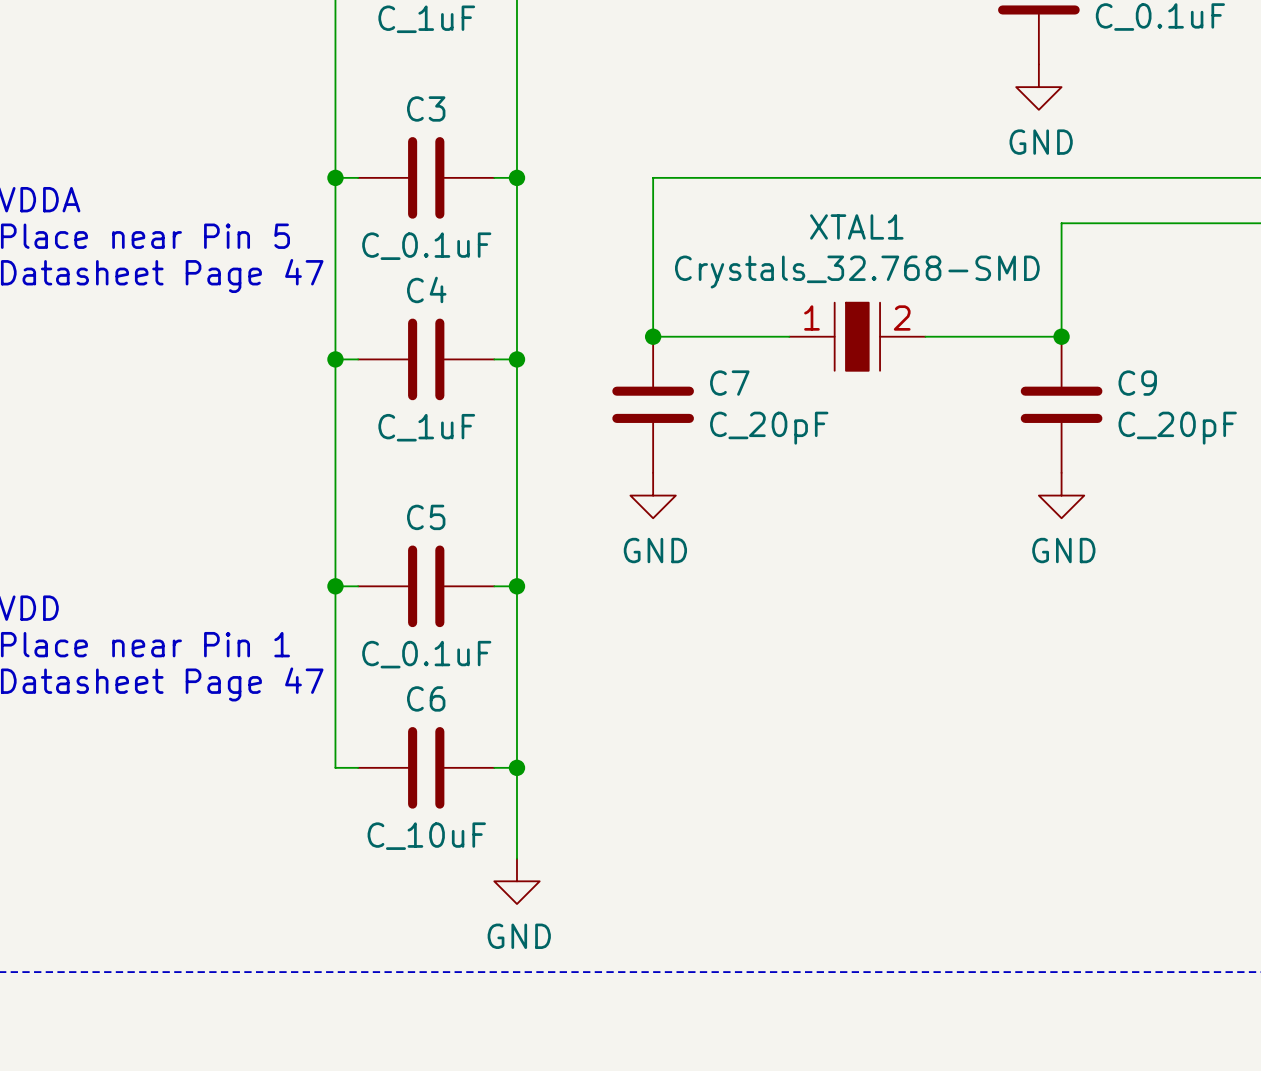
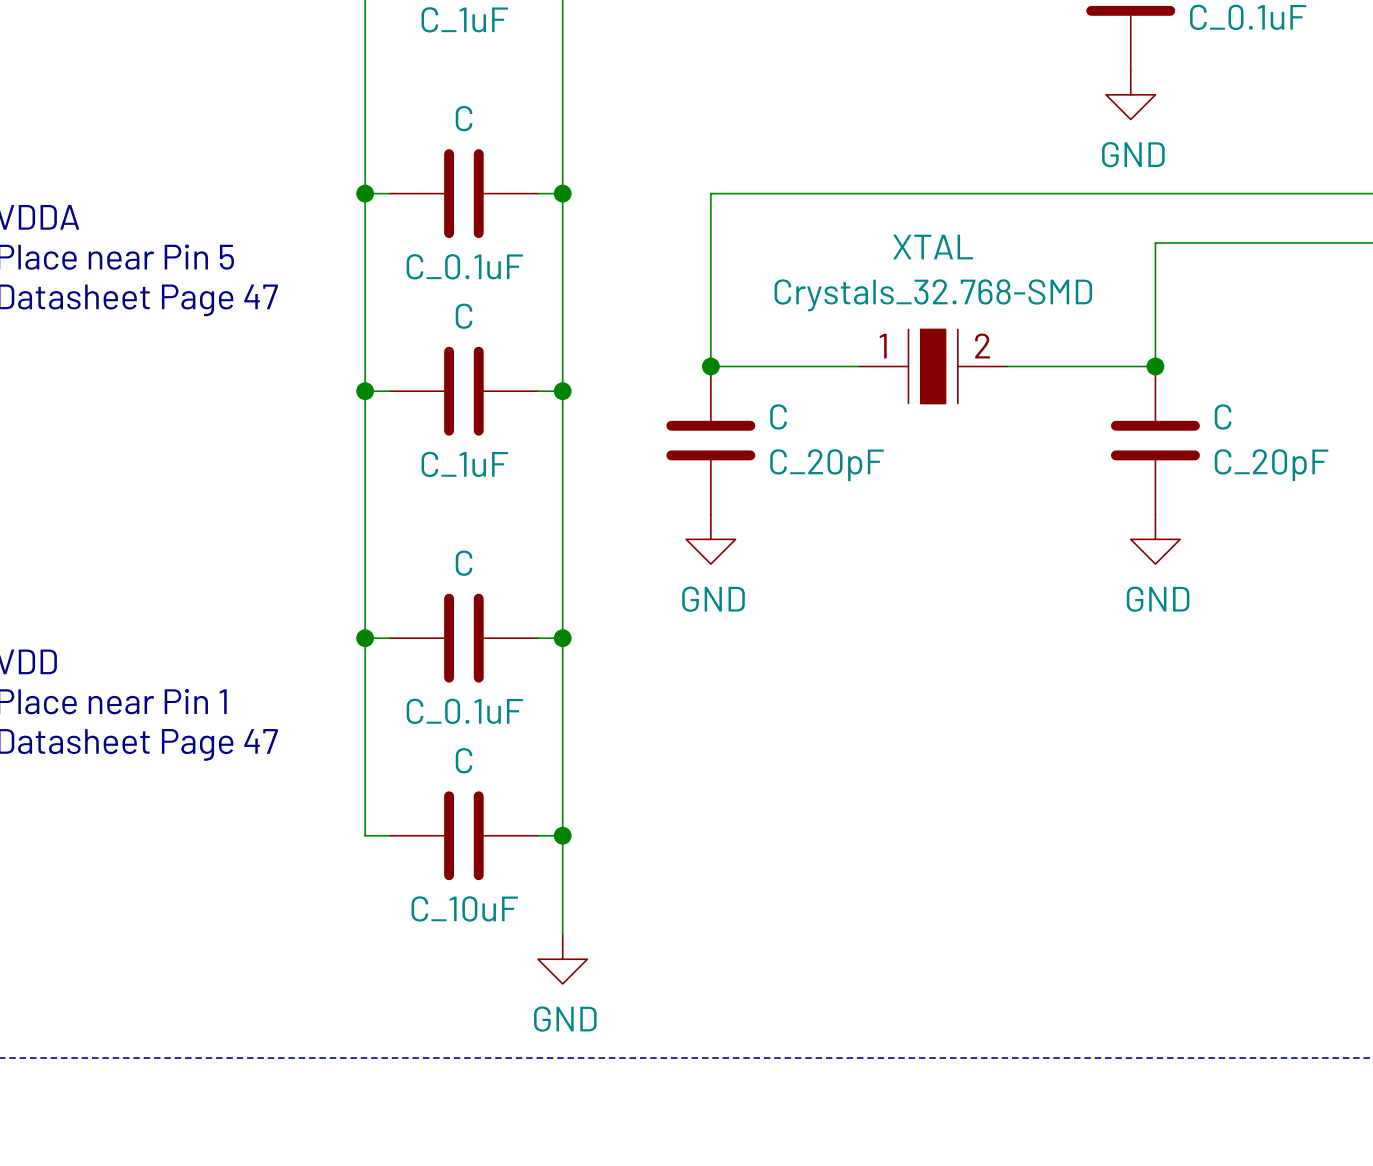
C3 name: C3 (426, 108) -> C (464, 118)
XTAL1 name: XTAL1 (856, 226) -> XTAL (933, 247)
C4 name: C4 (426, 289) -> C (464, 316)
C7 name: C7 (729, 383) -> C (778, 416)
C9 name: C9 (1137, 383) -> C (1223, 416)
C5 name: C5 (426, 517) -> C (464, 563)
C6 name: C6 (426, 698) -> C (464, 760)

